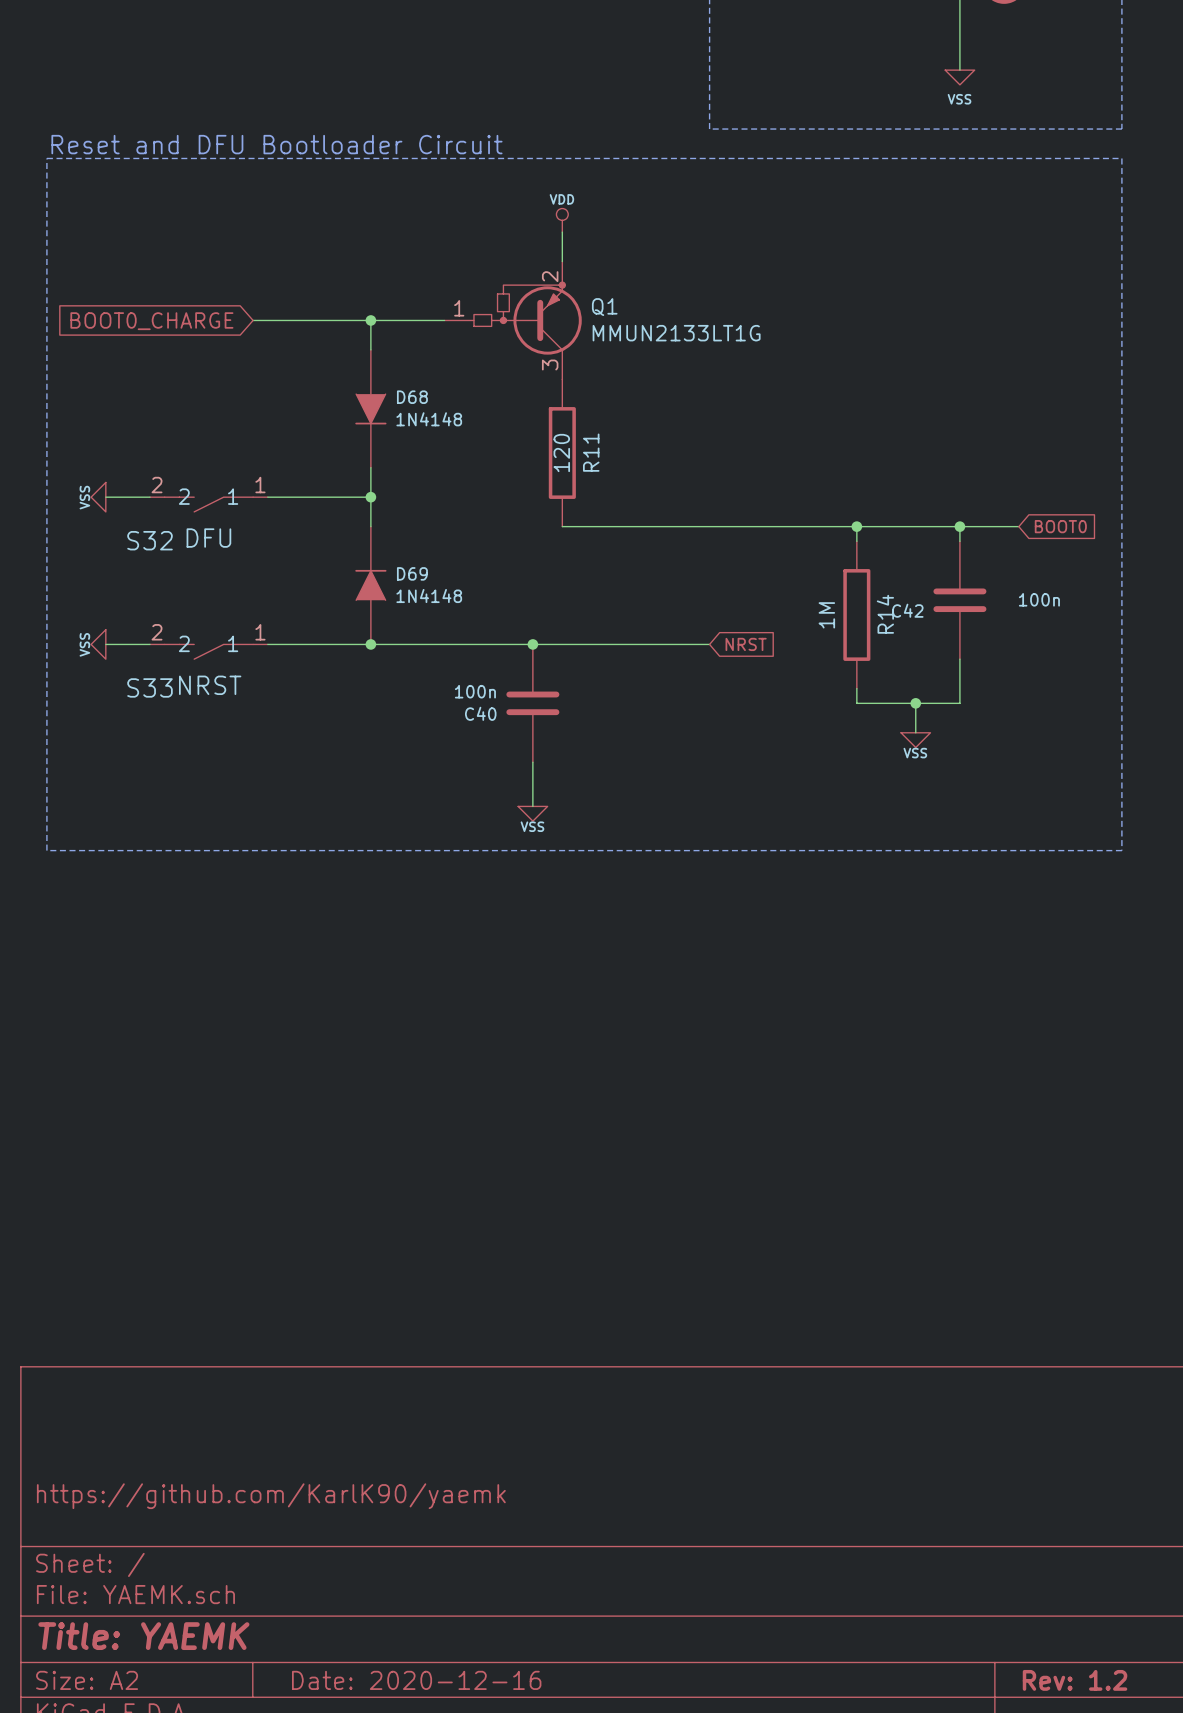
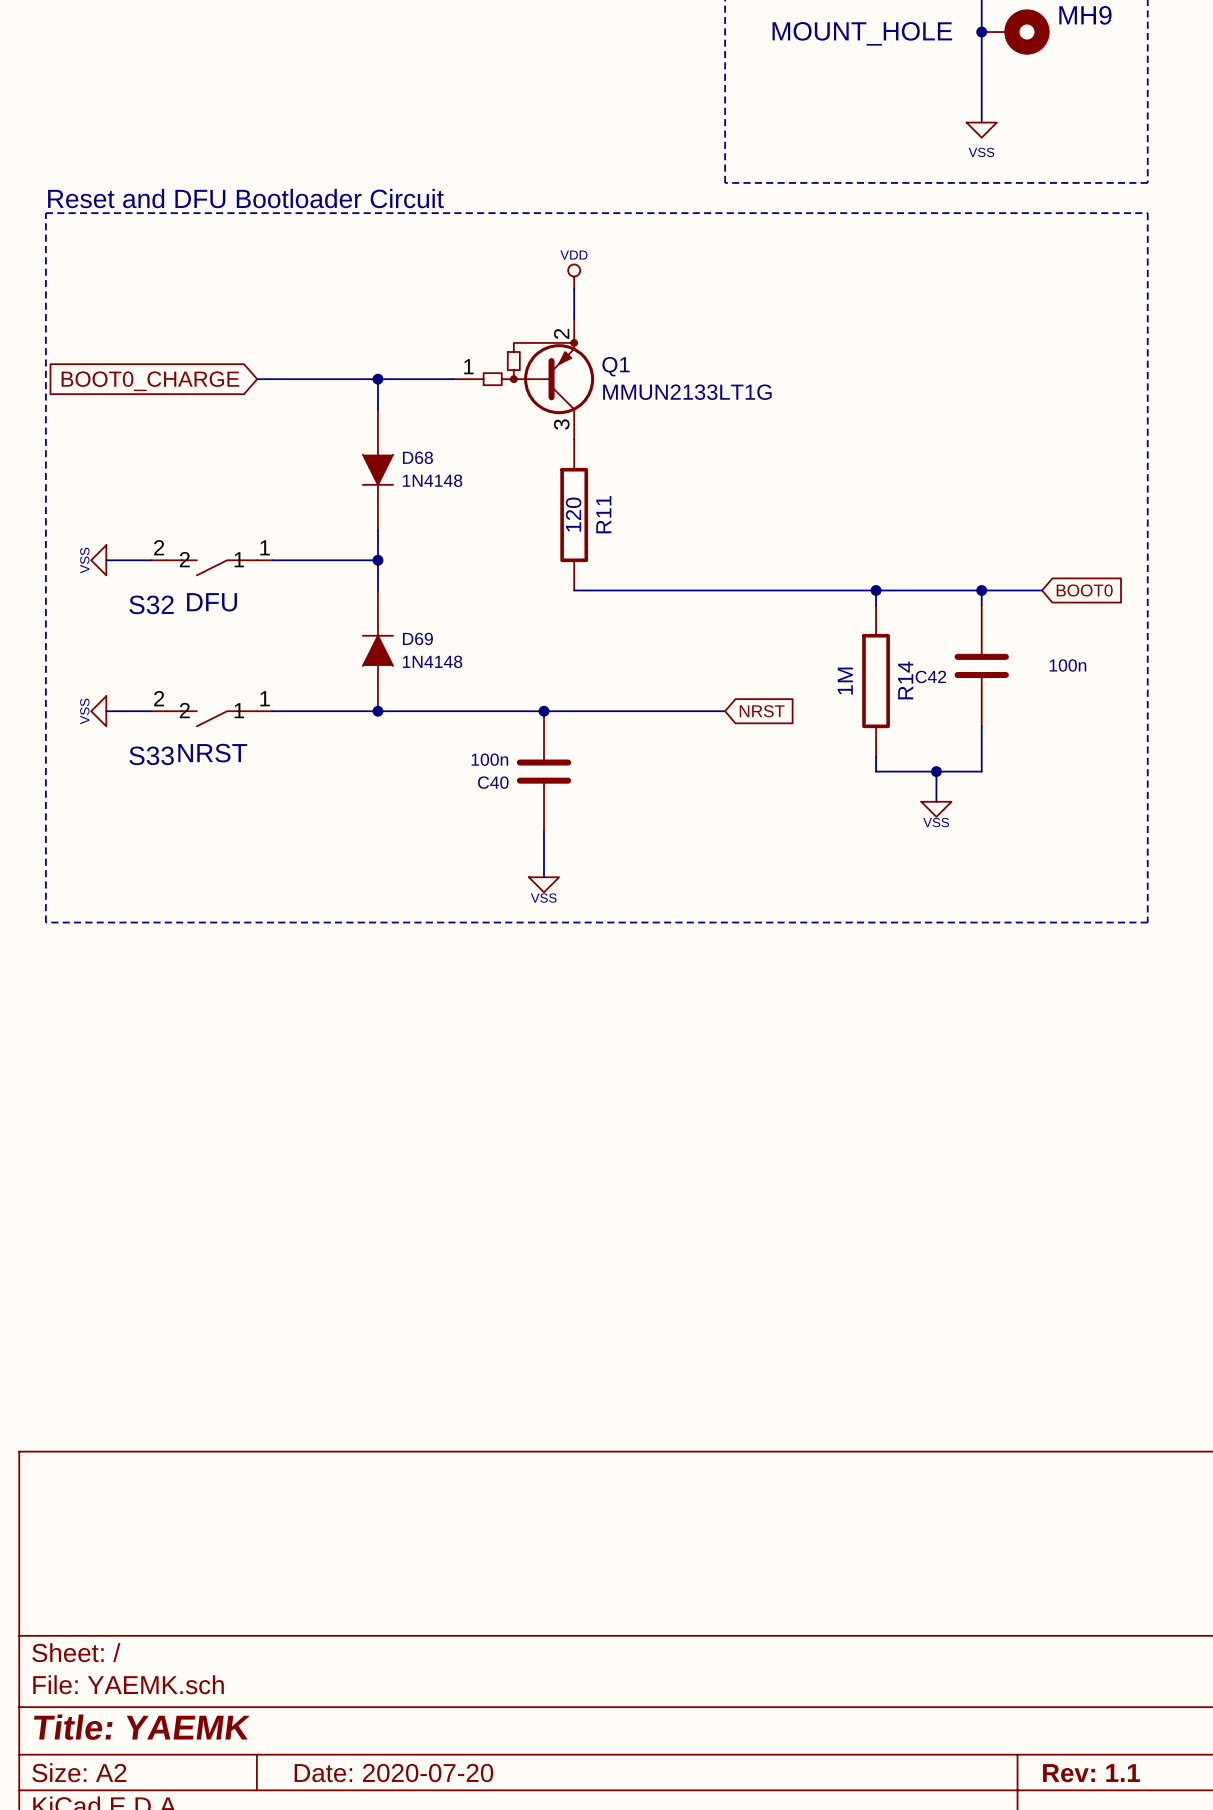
title block: https://github.com/KarlK90/yaemk (271, 1496) -> none
title block: Date: 2020-12-16 (416, 1680) -> Date: 2020-07-20 (393, 1773)
title block: Rev: 1.2 (1075, 1680) -> Rev: 1.1 (1091, 1773)

